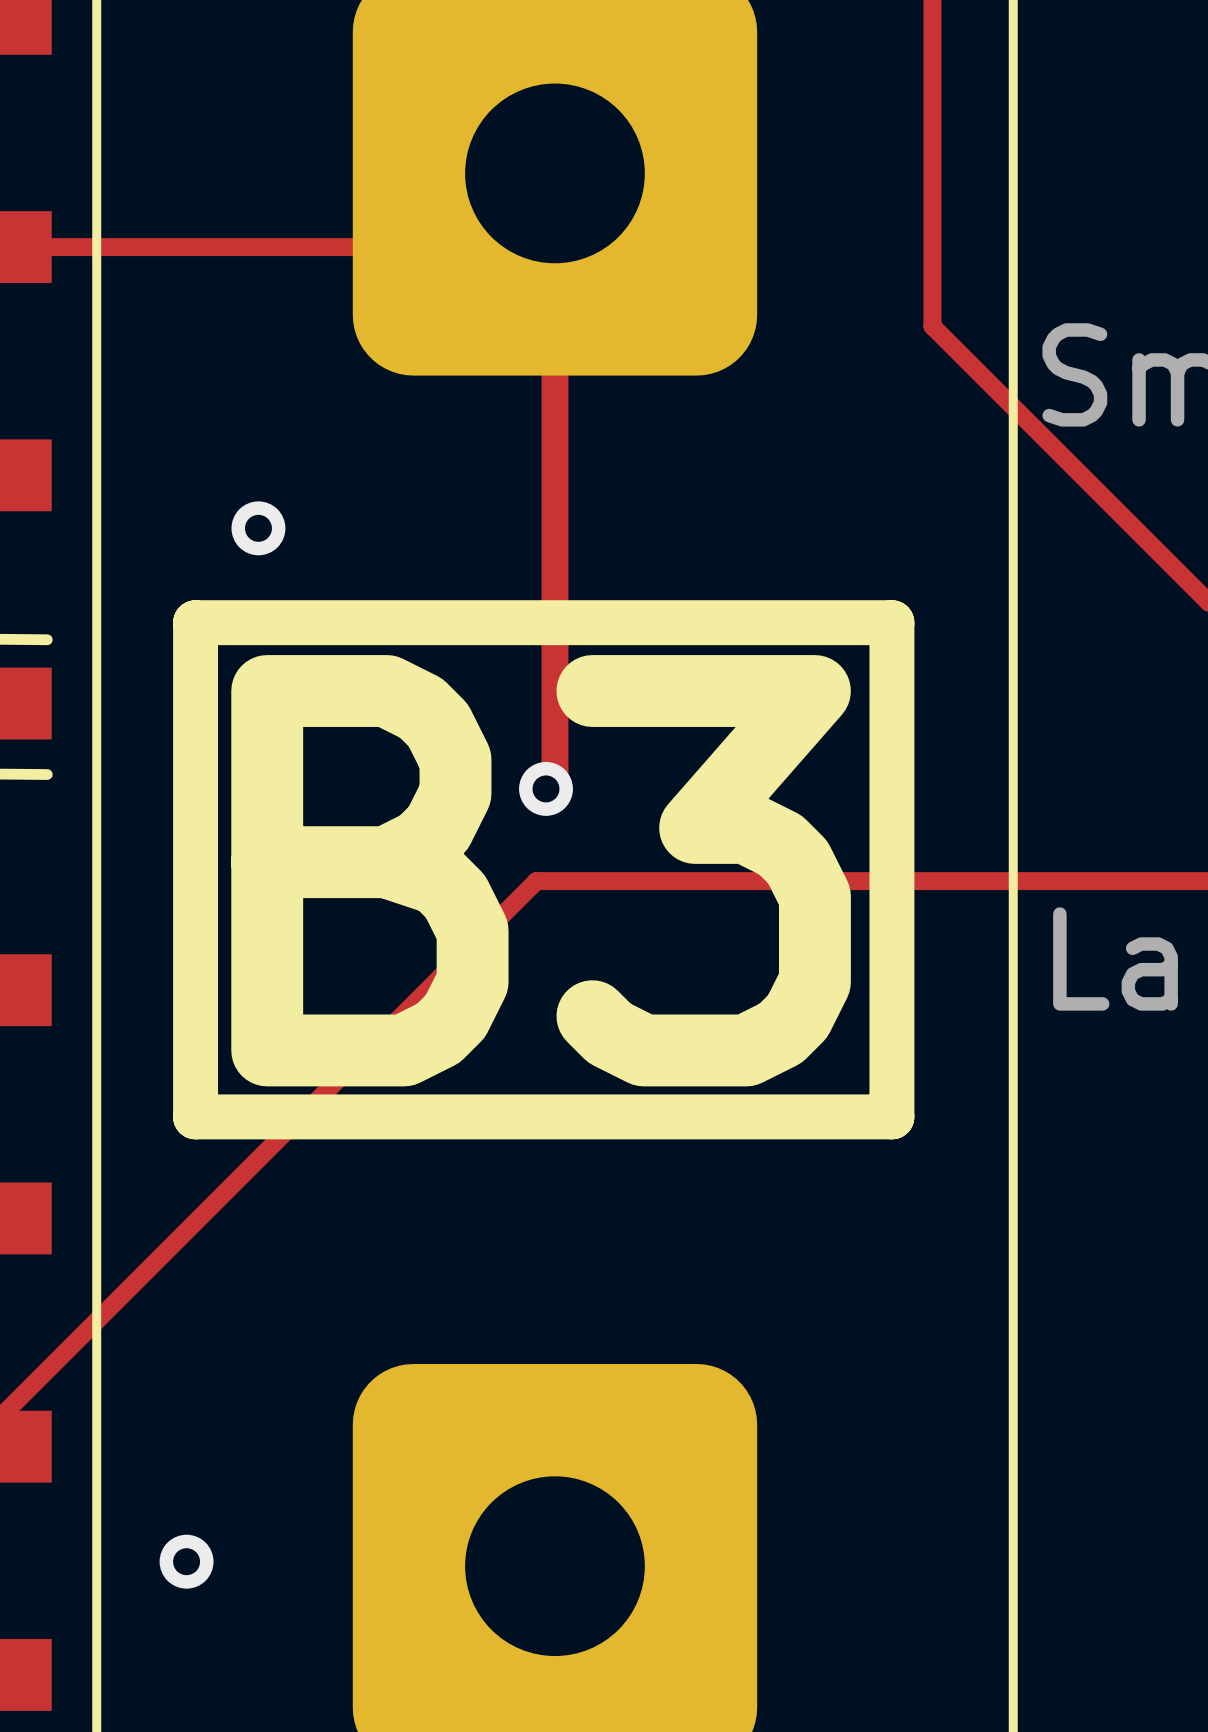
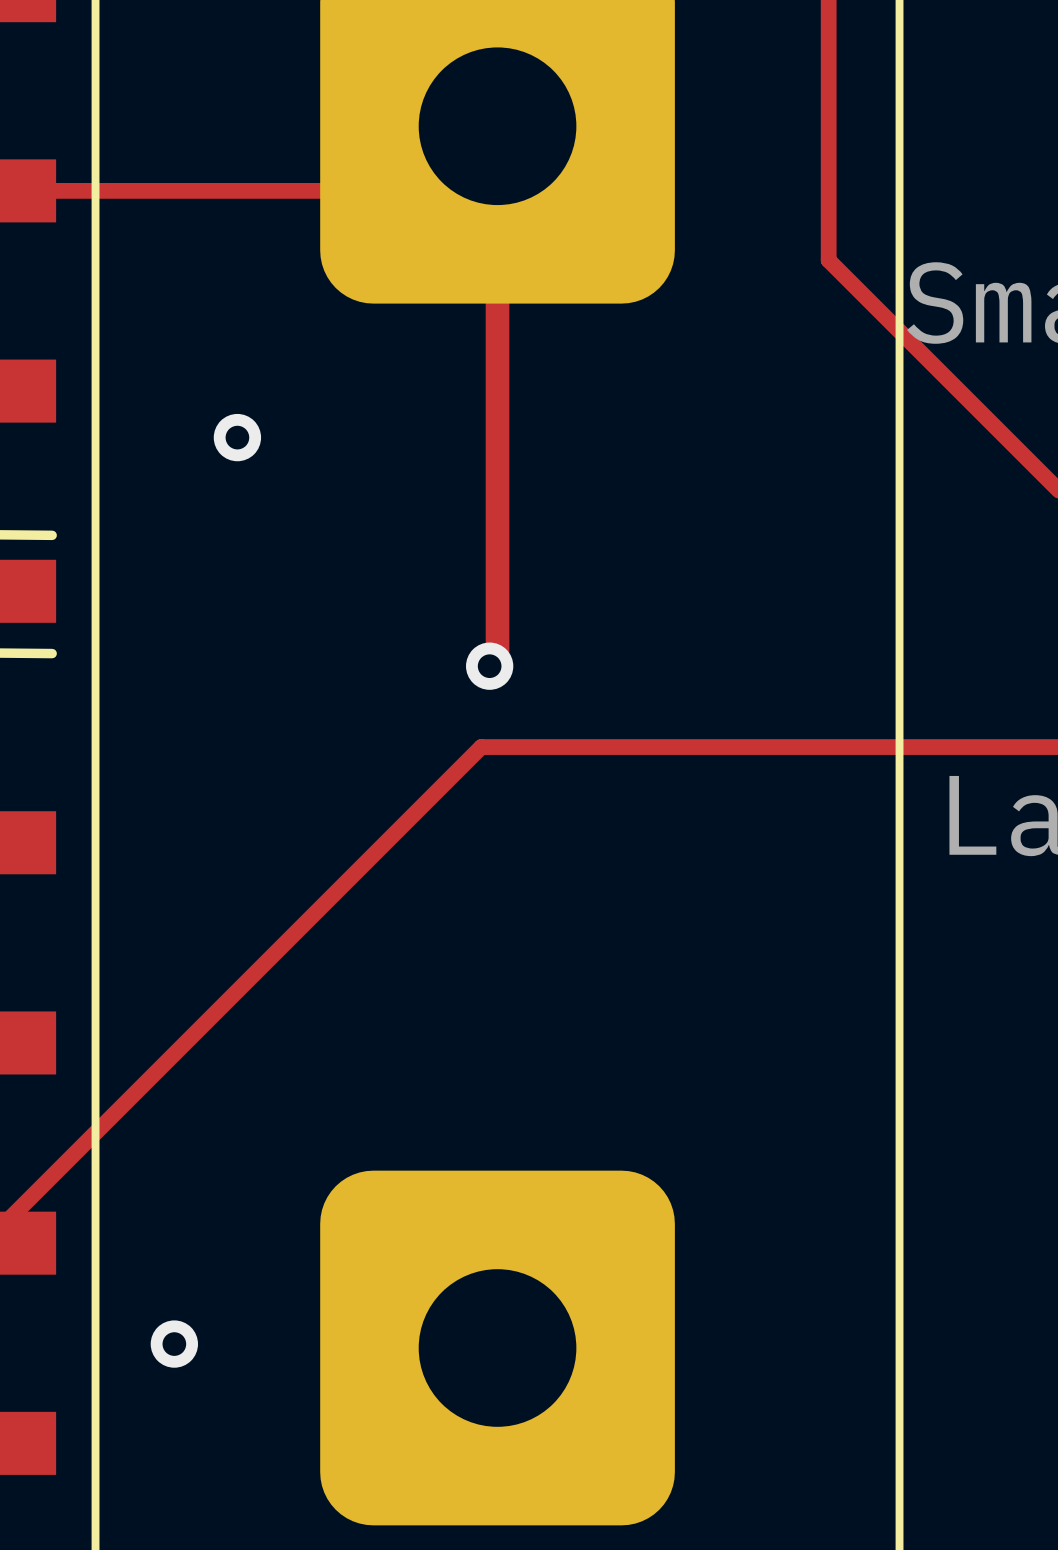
line: (195, 622) (891, 622) (891, 1116) (195, 1116) (195, 622) -> none
text: B3 (541, 870) -> none

